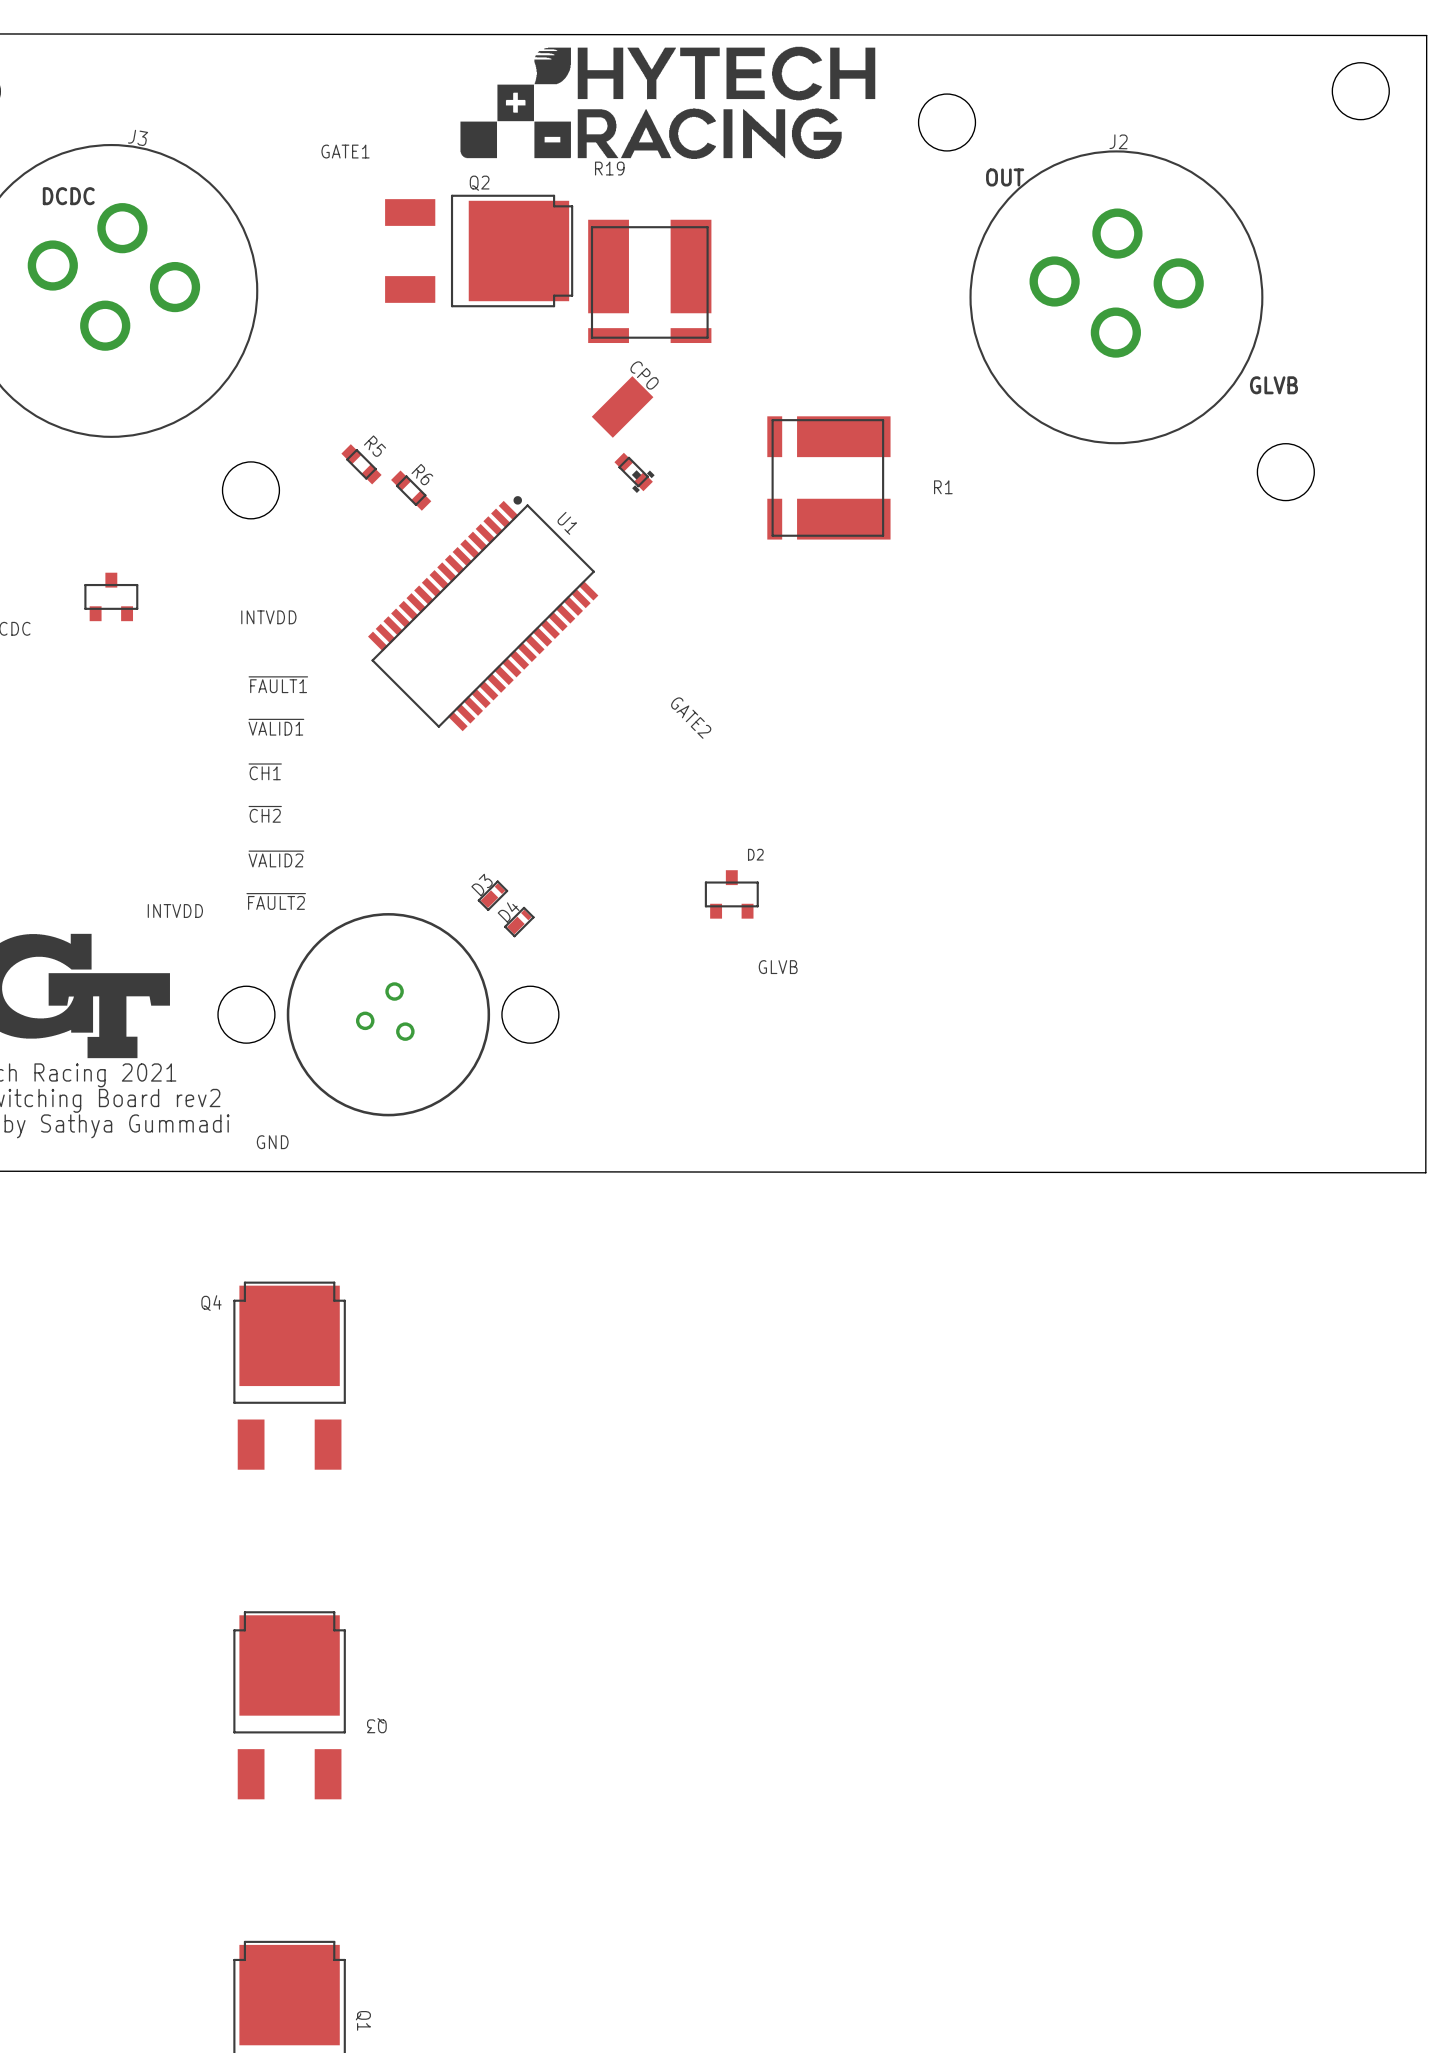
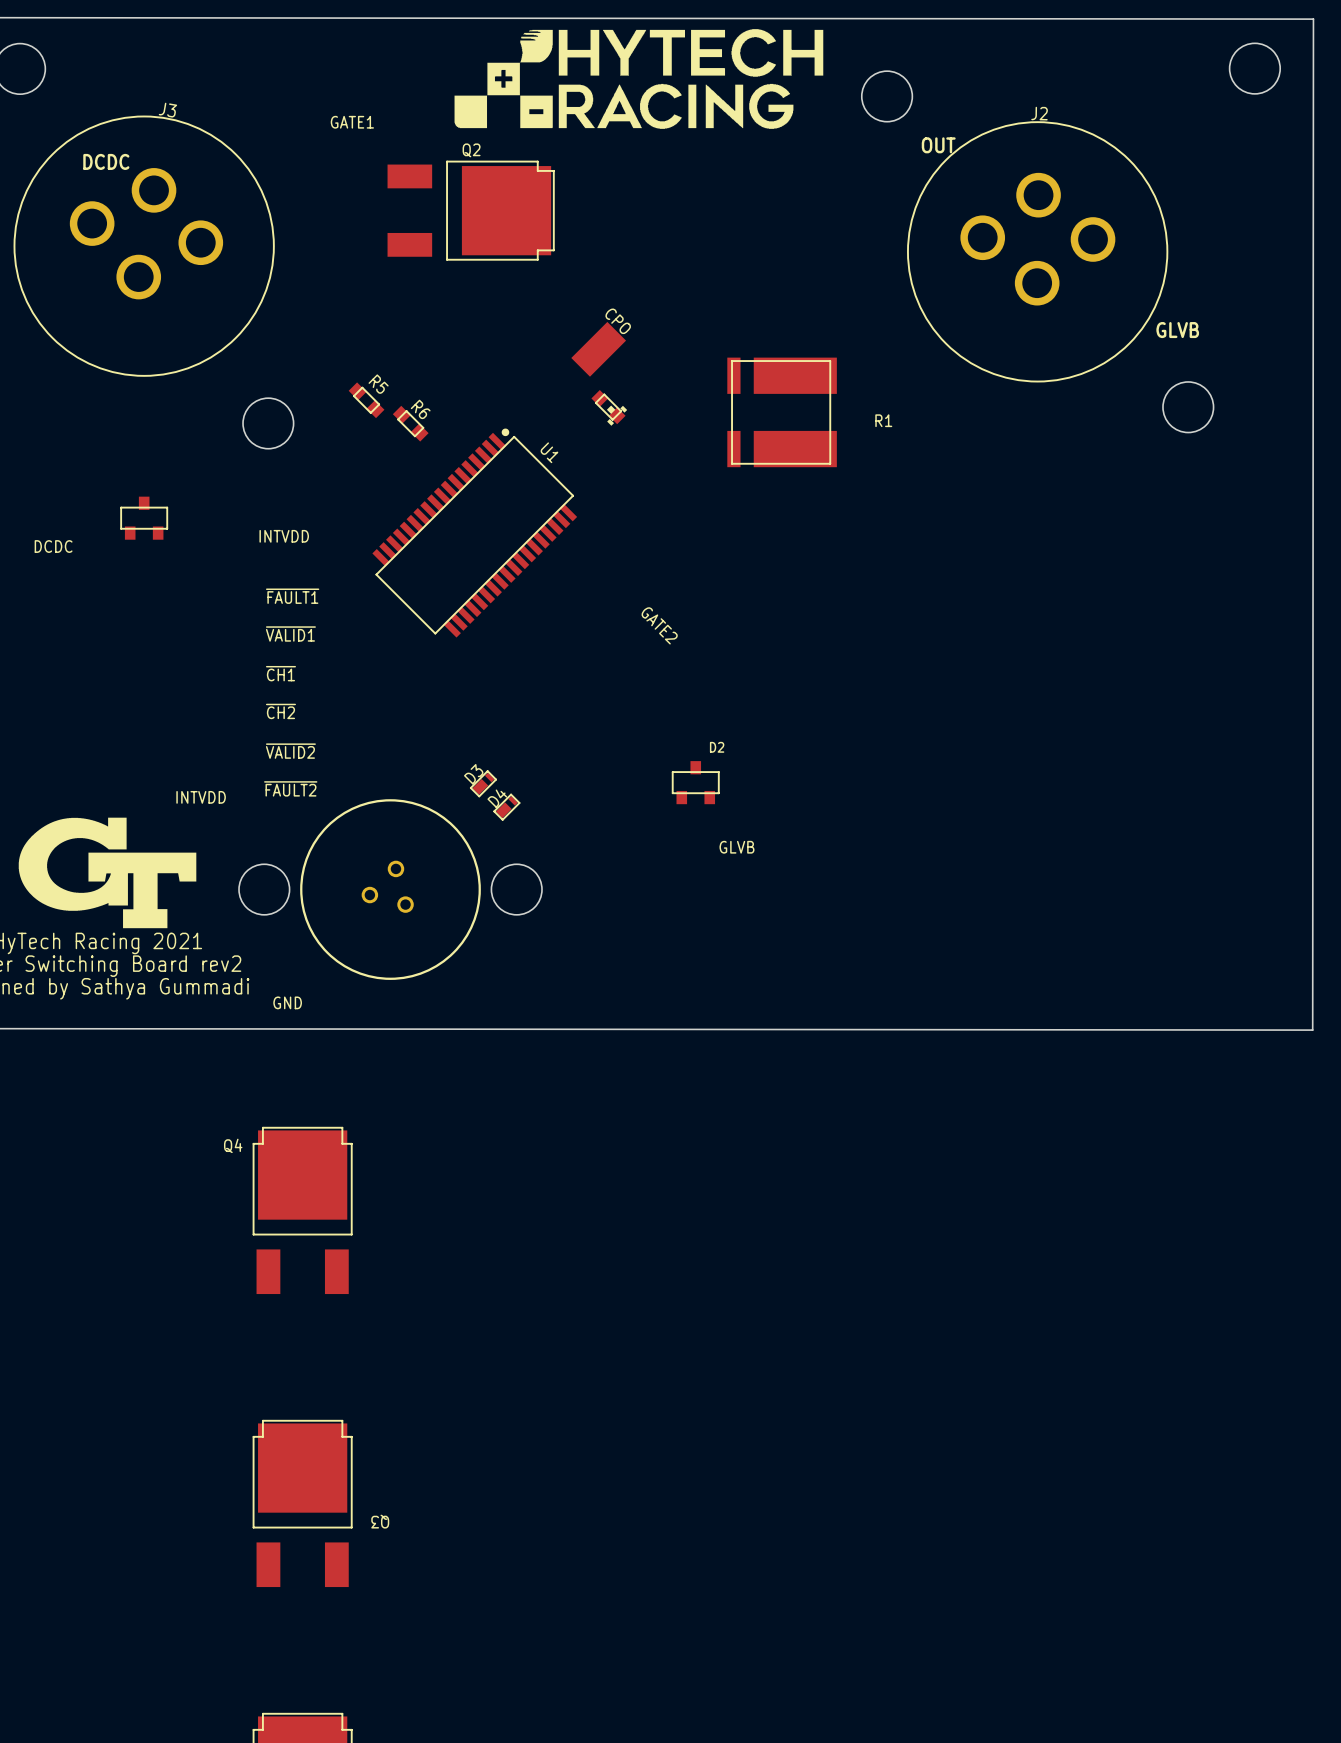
R19: (649, 281) -> none

